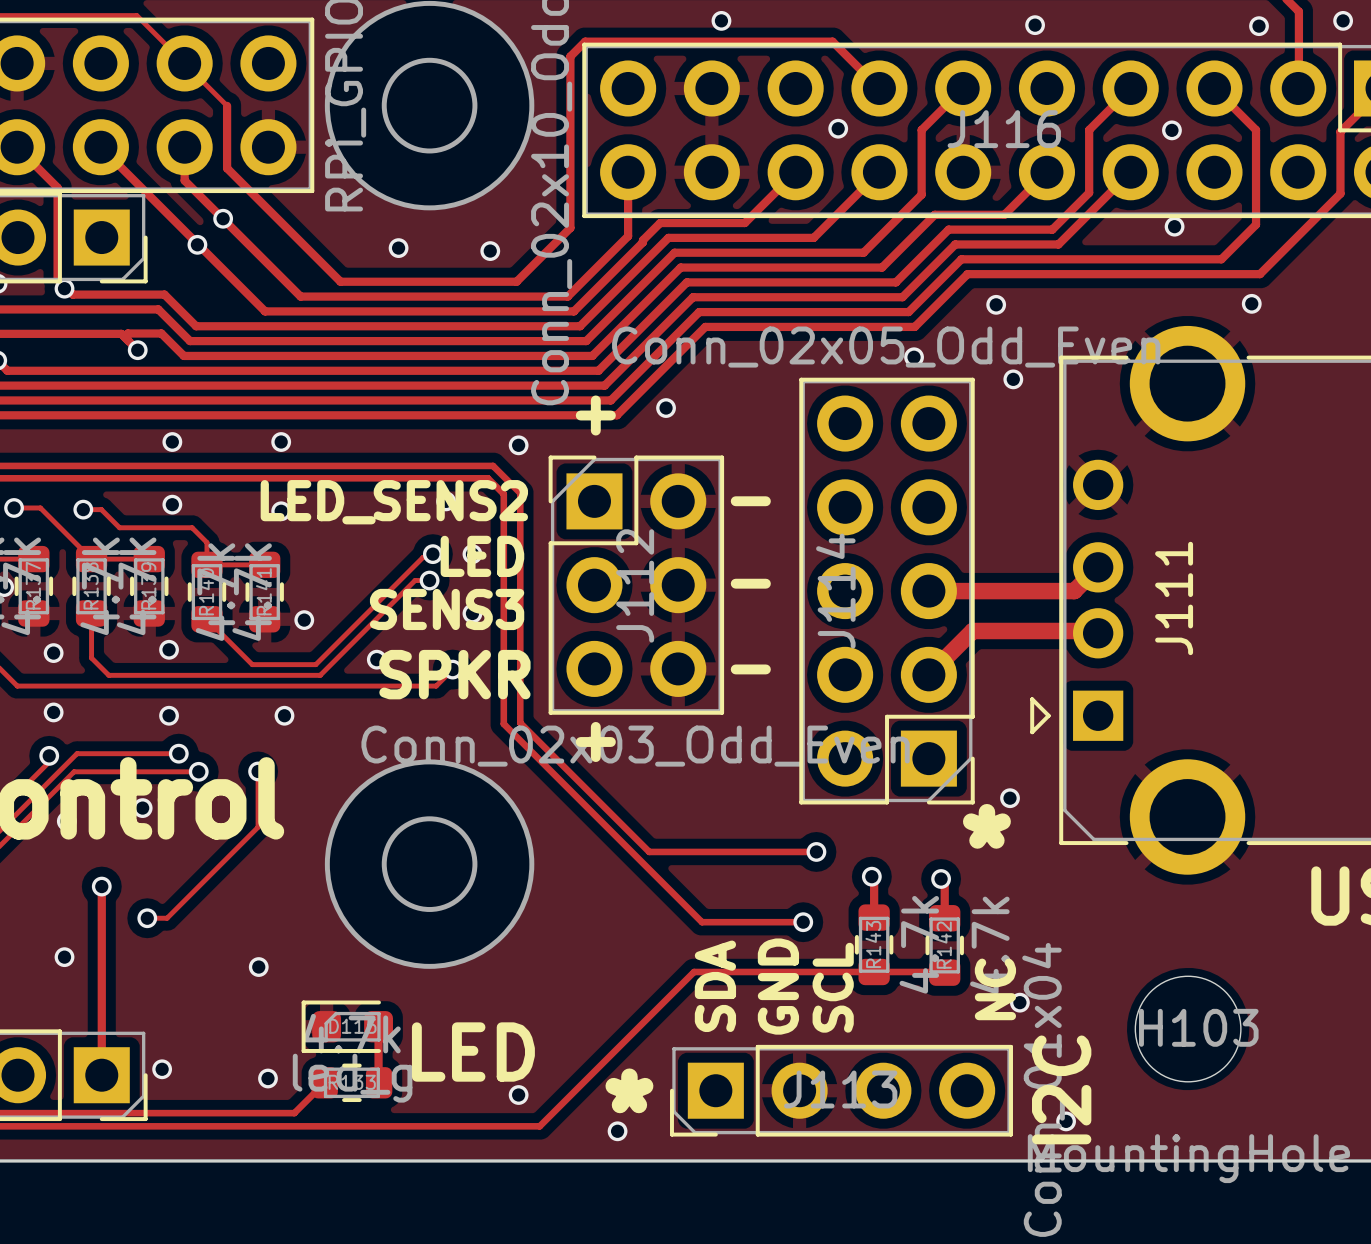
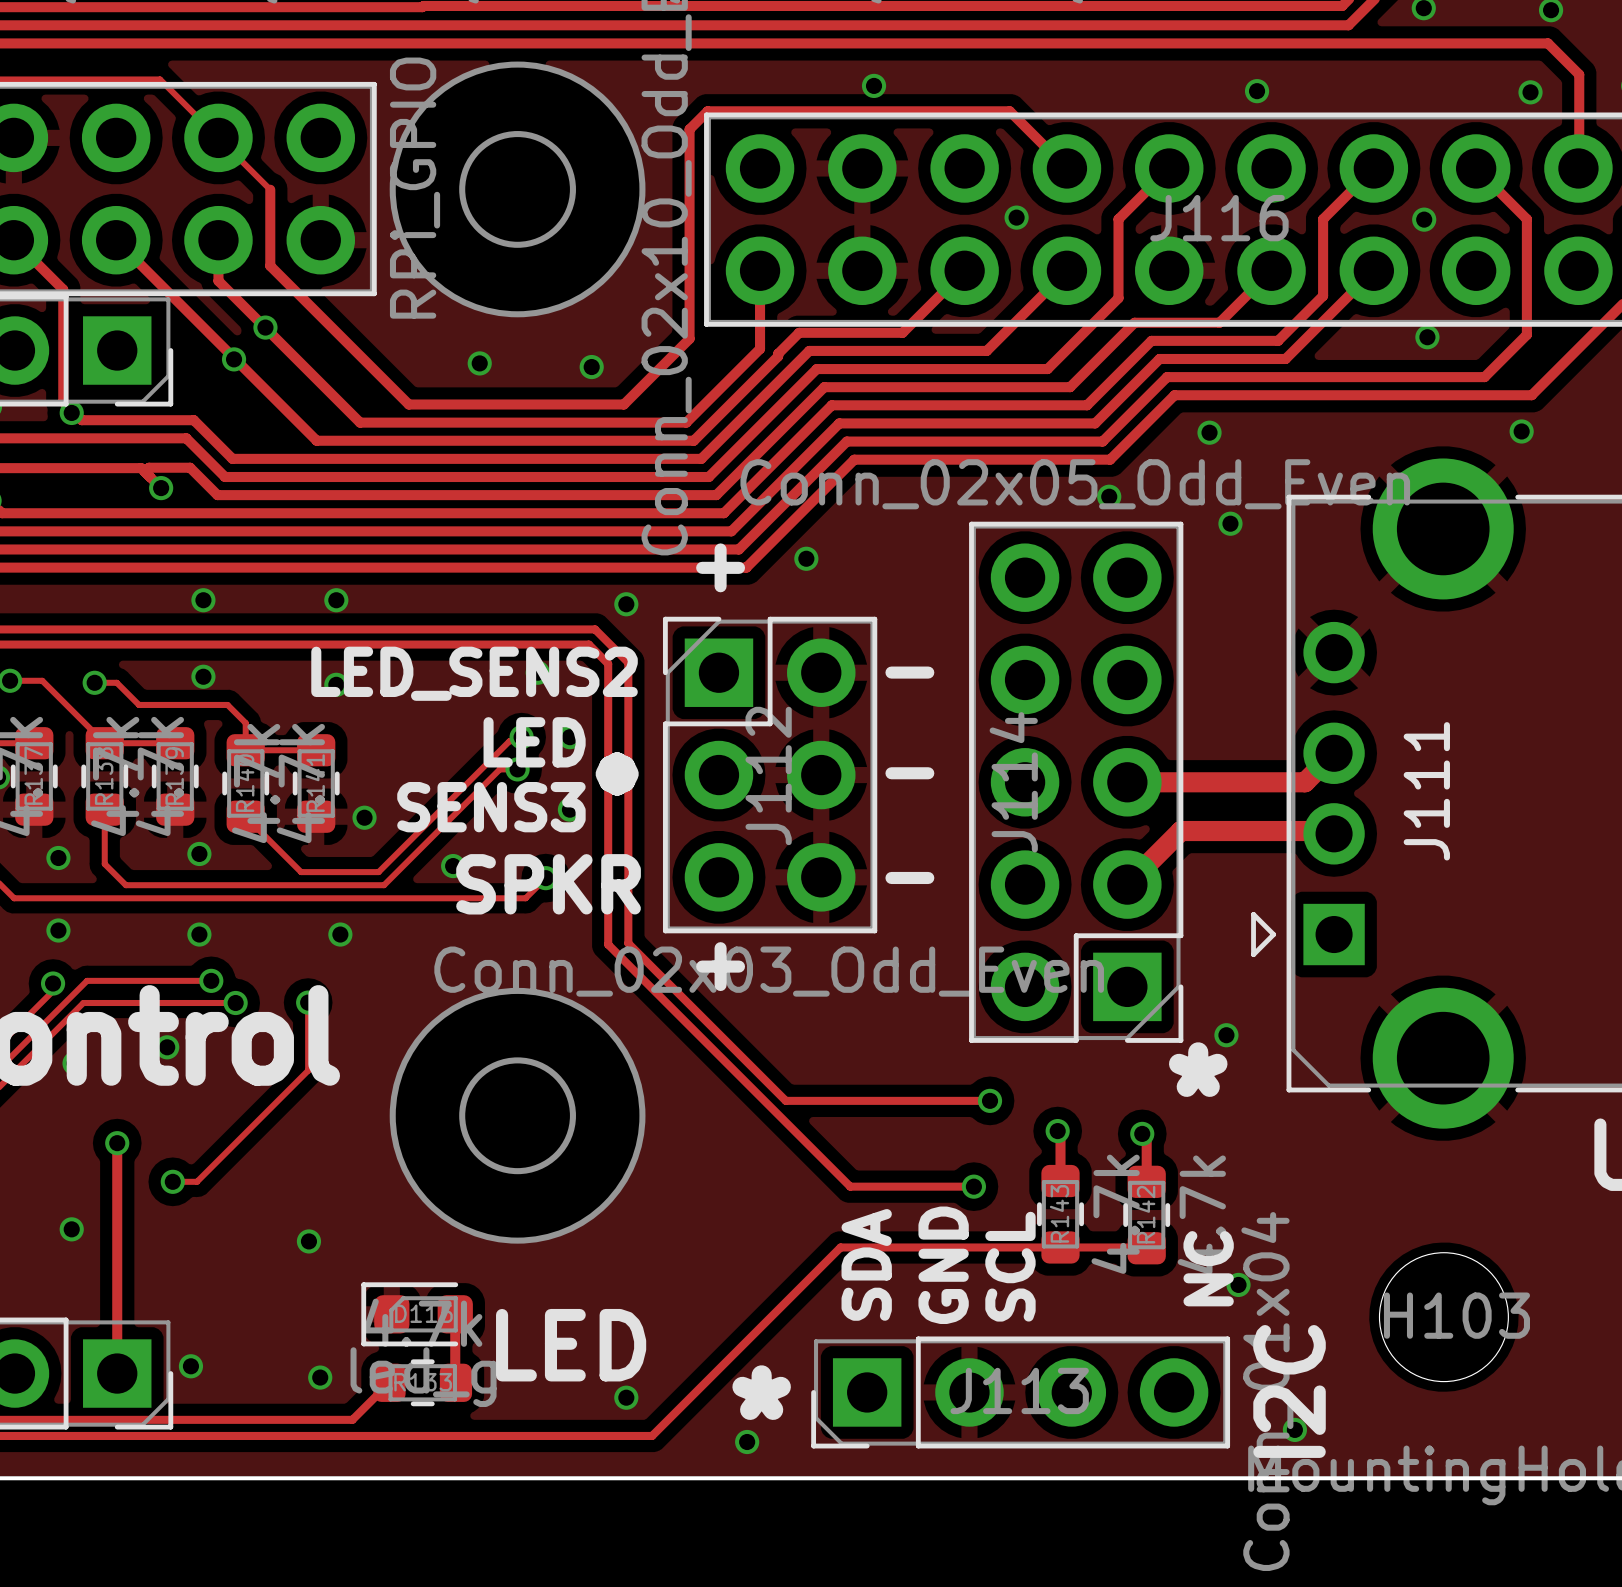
text position: LED (482, 556) -> LED (534, 742)
text: none -> • (617, 773)
text position: SENS3 (447, 609) -> SENS3 (491, 807)

